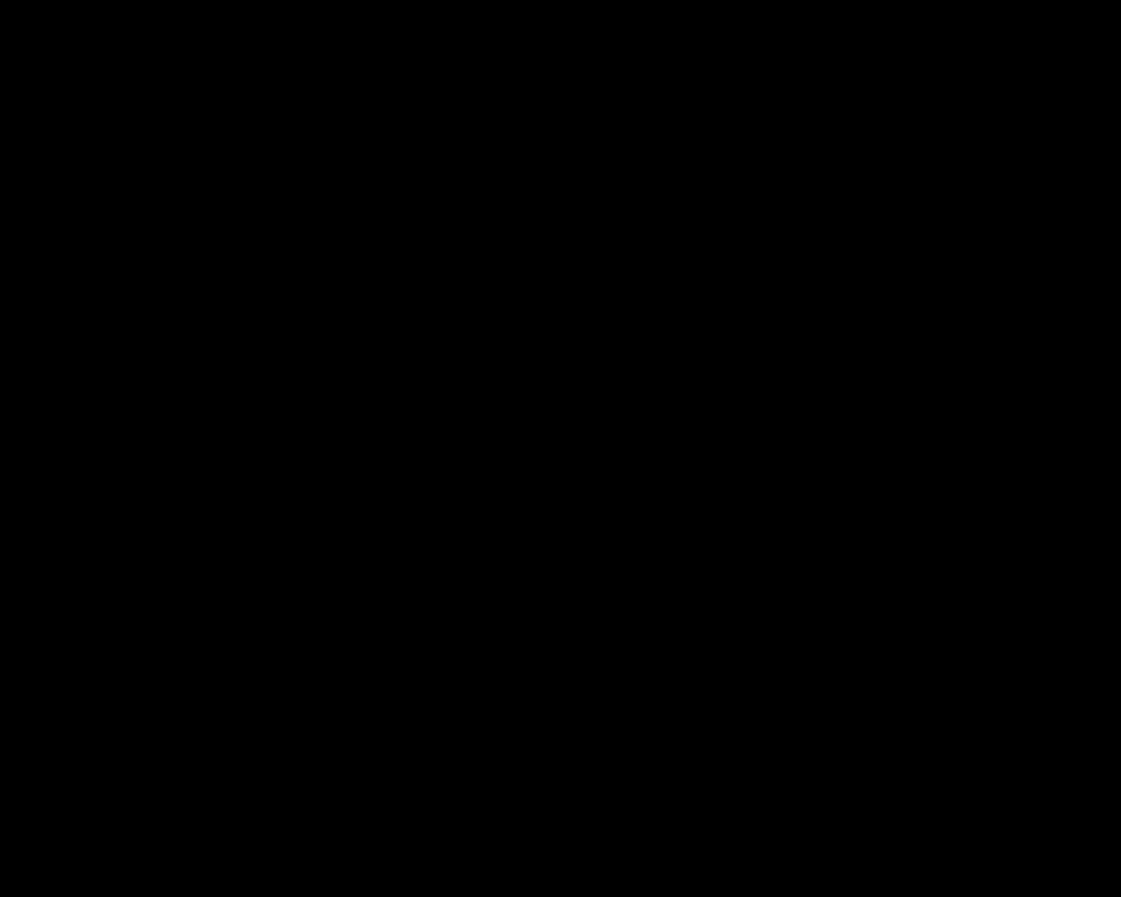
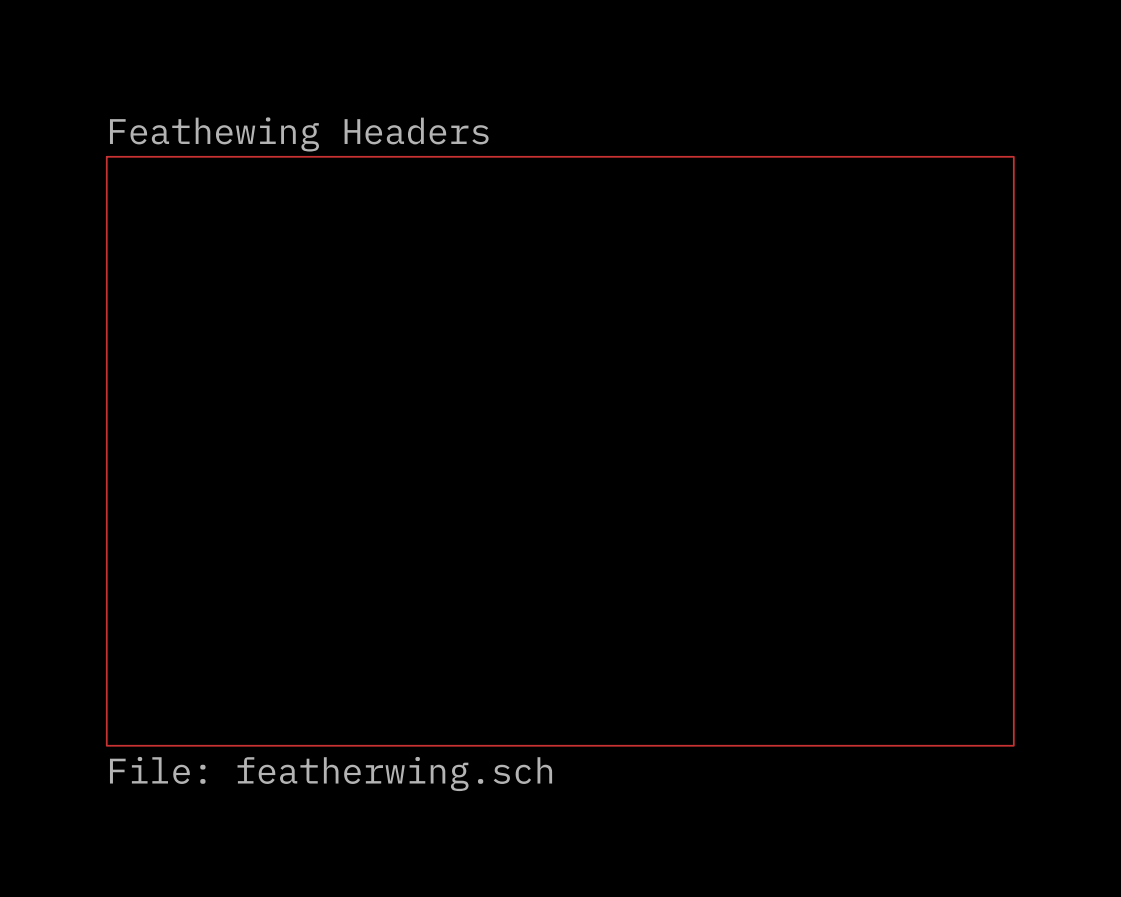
sheet Feathewing Headers: none -> File: featherwing.sch (560, 451)

